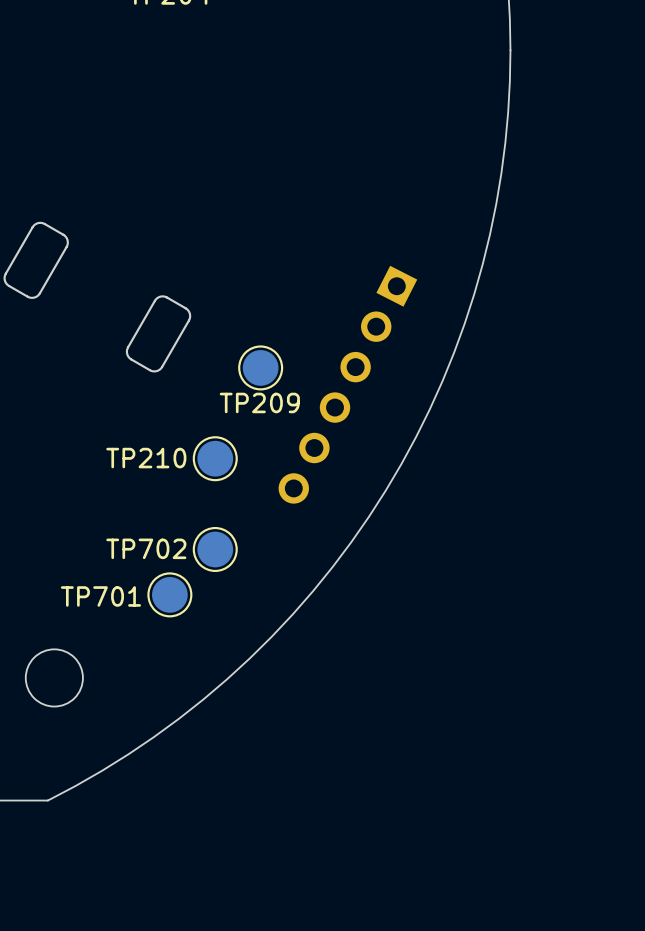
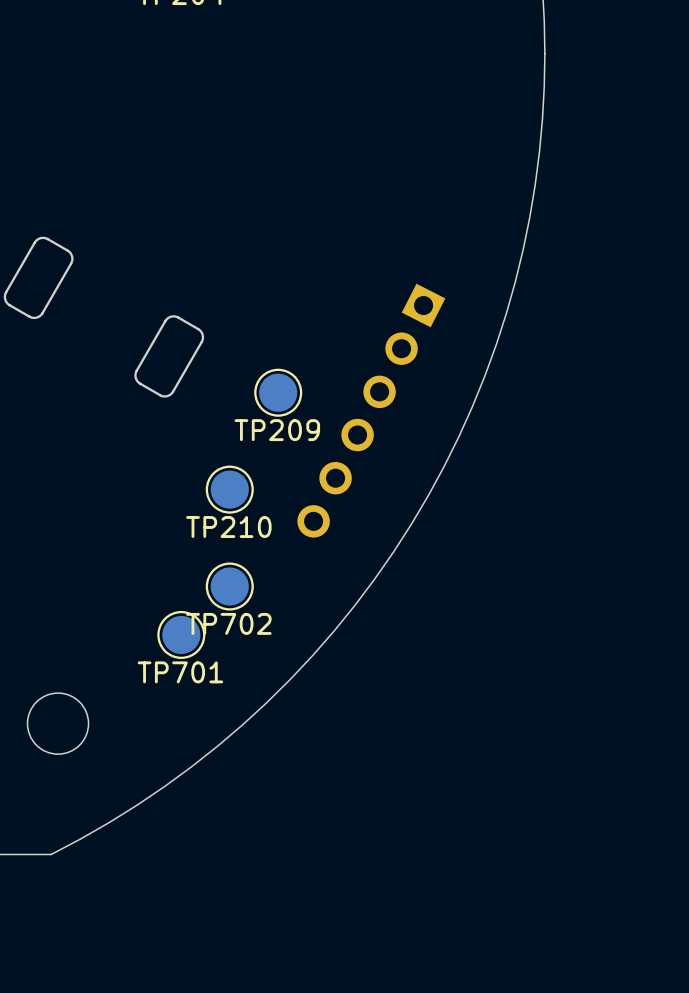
TP210 name position: TP210 (146, 458) -> TP210 (228, 527)
TP702 name position: TP702 (146, 548) -> TP702 (228, 623)
TP701 name position: TP701 (100, 596) -> TP701 (180, 672)

